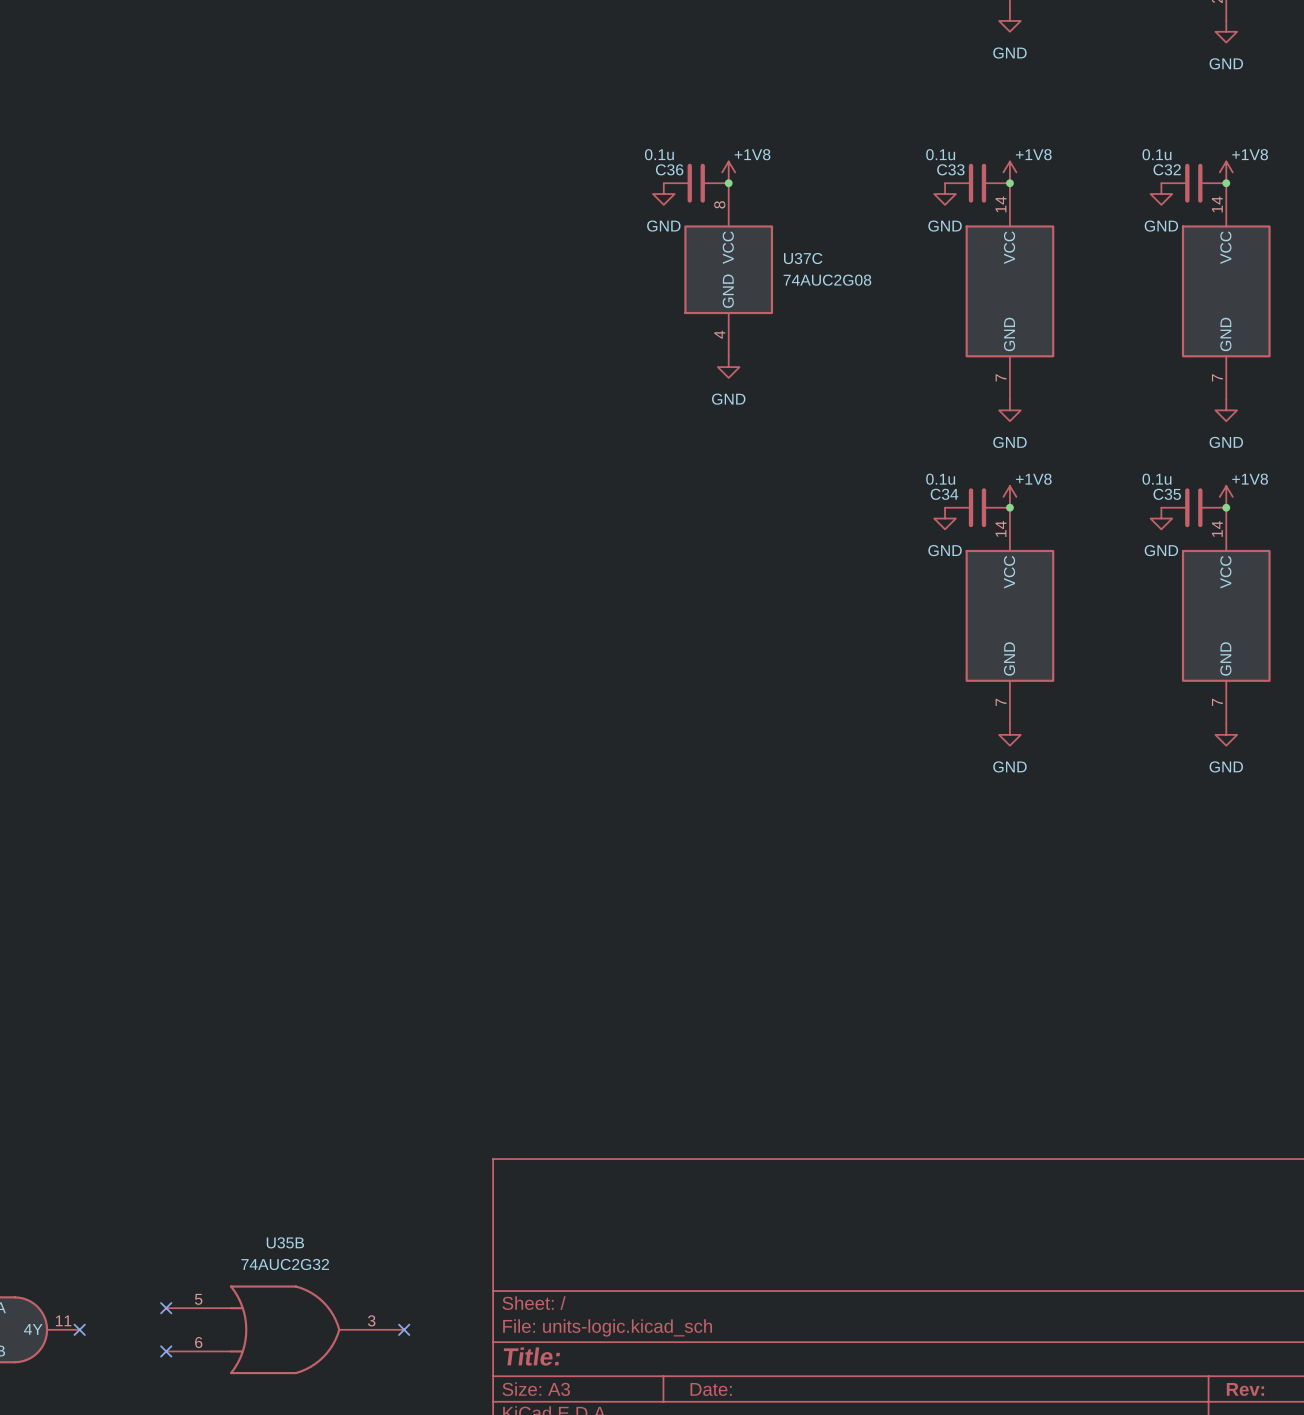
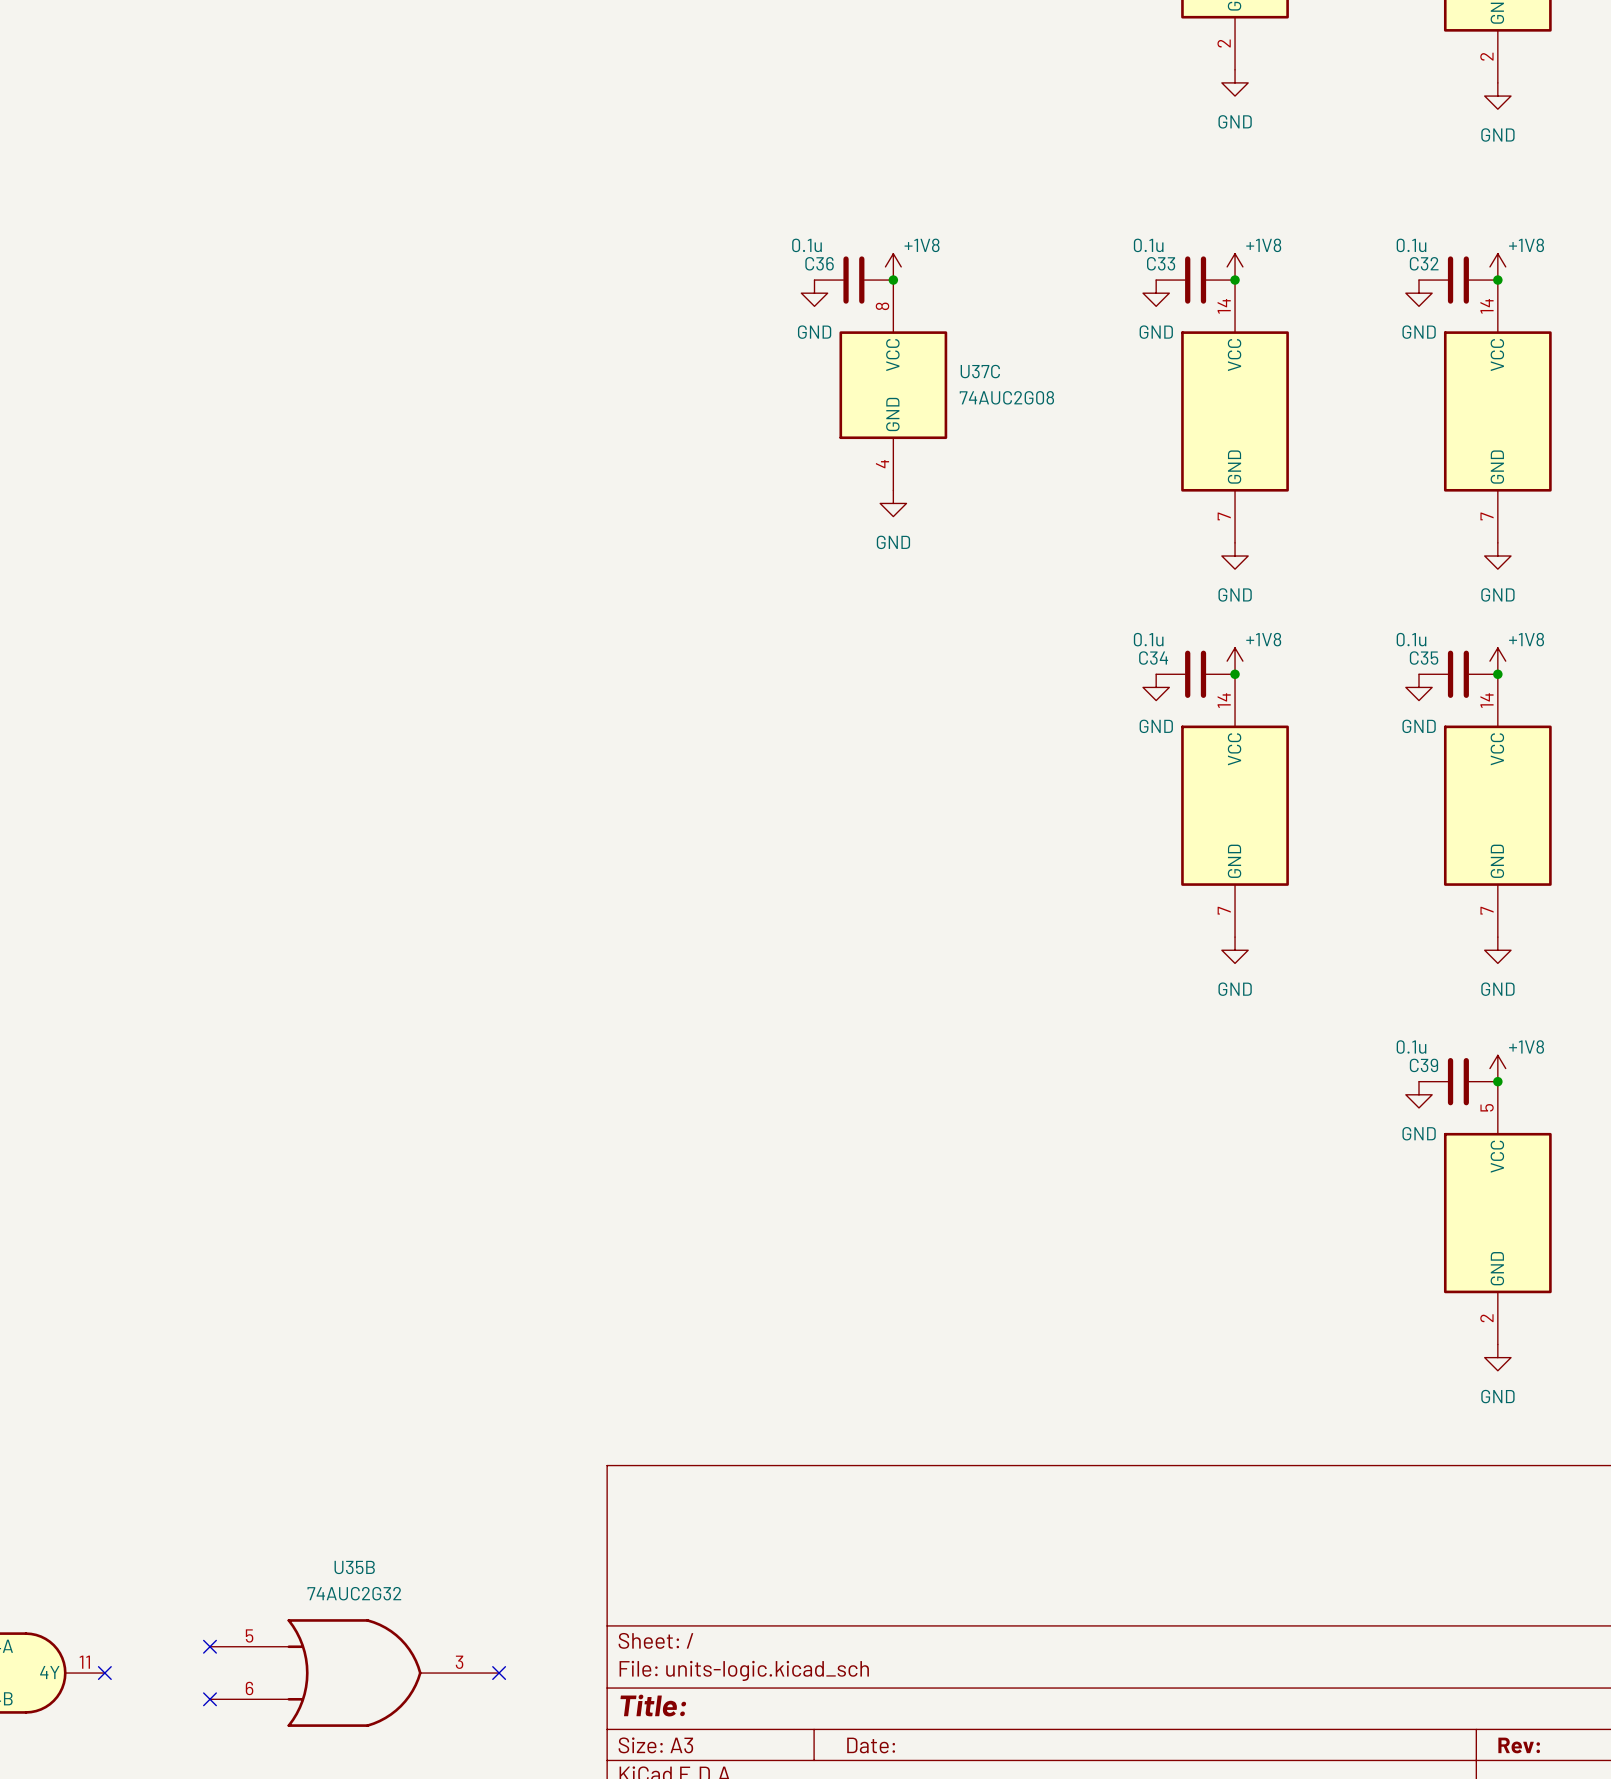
power symbol: none -> +1V8 (1497, 1068)
C39: none -> 0.1u (1458, 1081)
junction: none -> (1497, 1081)
power symbol: none -> GND (1419, 1094)
part: none -> (1497, 1213)
power symbol: none -> GND (1497, 1357)

